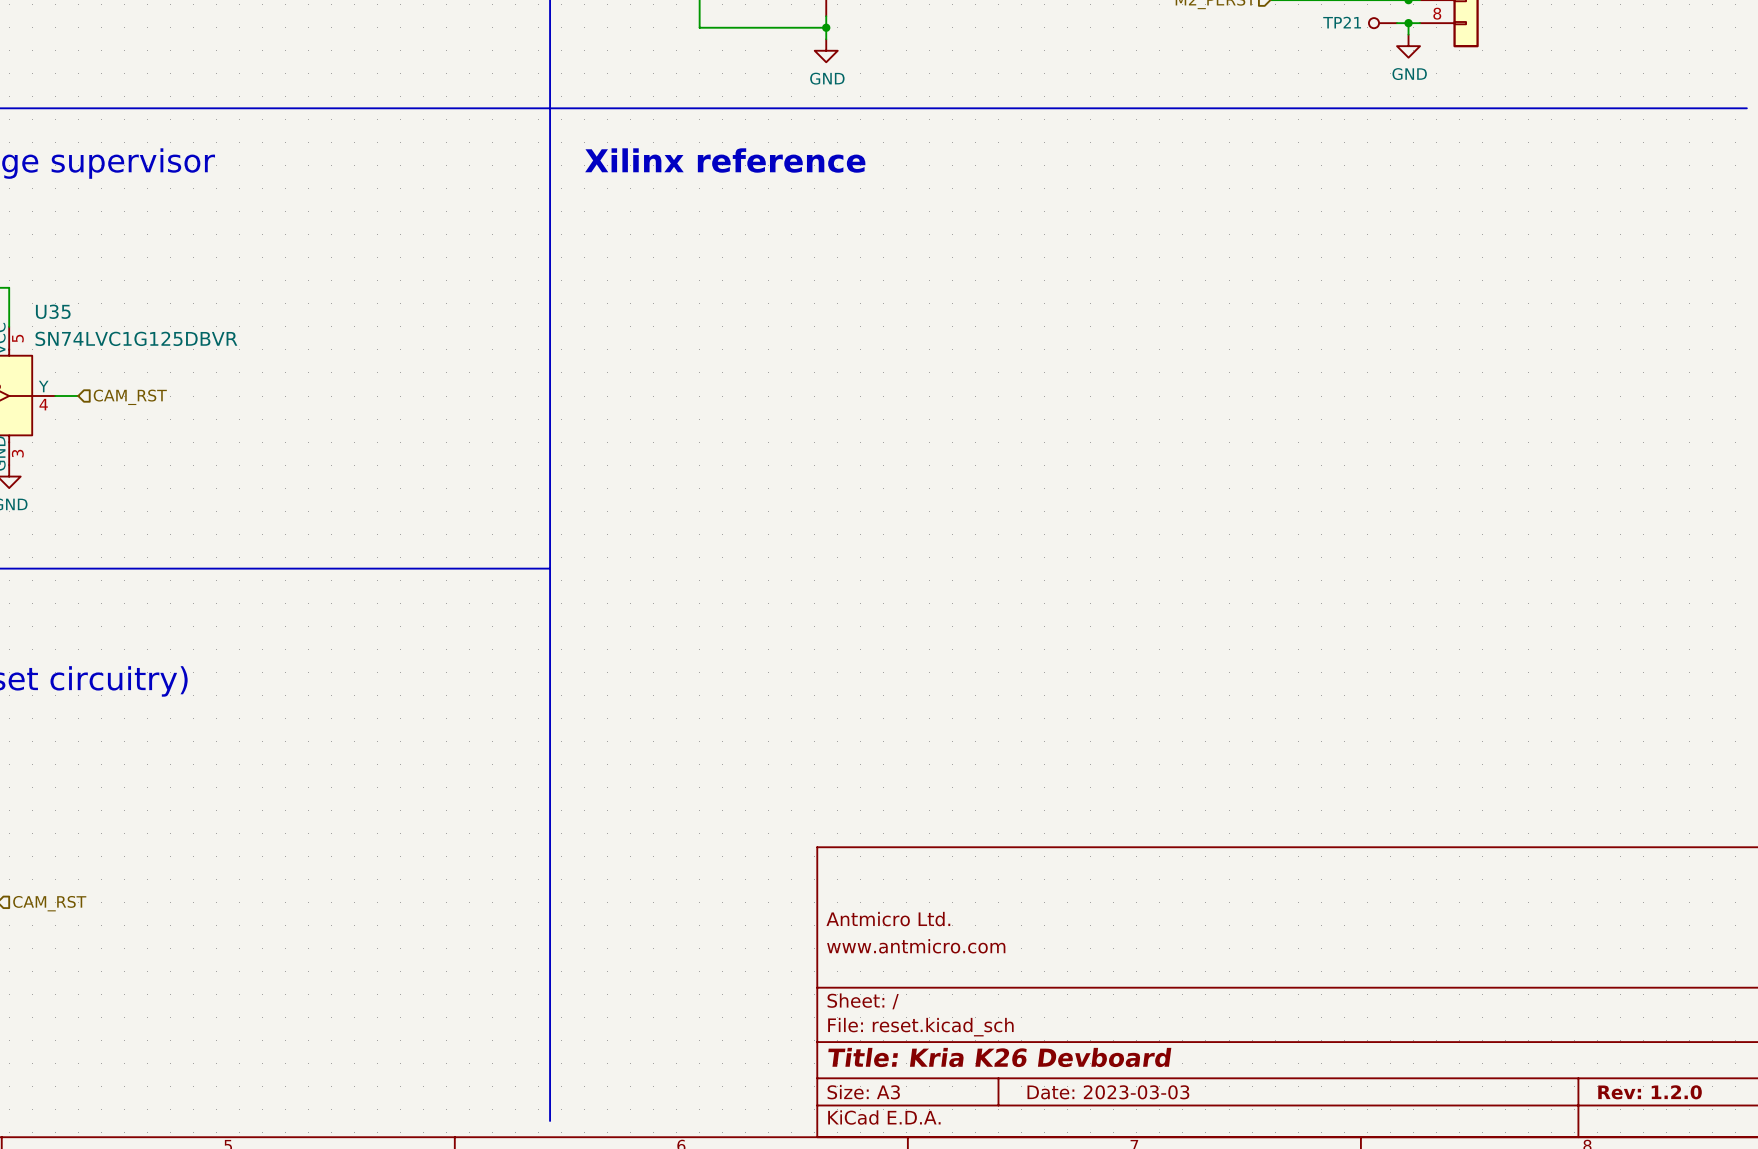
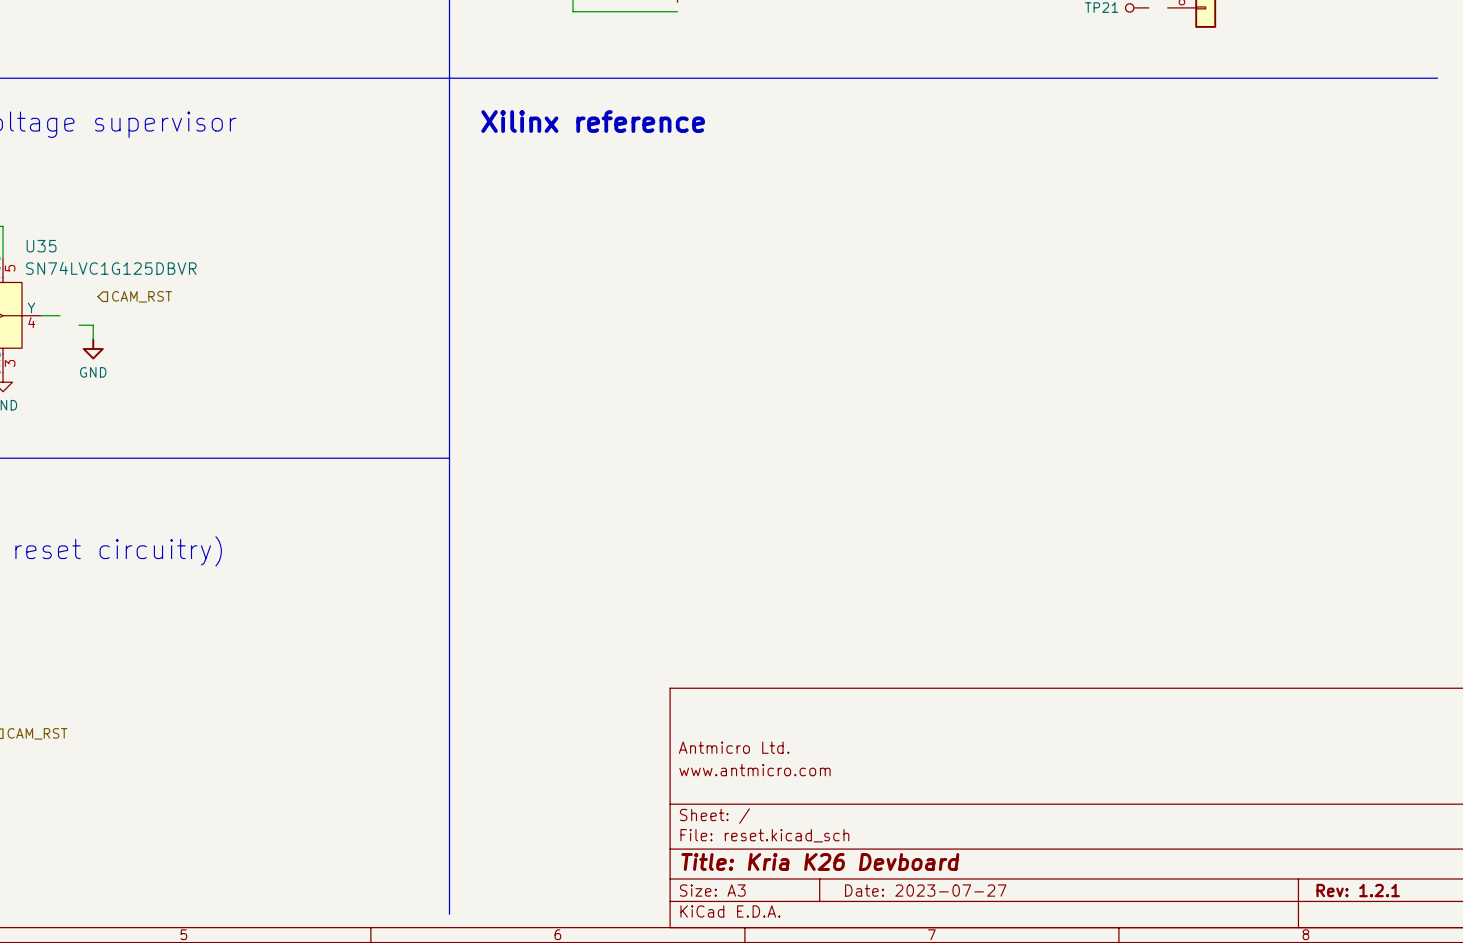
wire: (826, 16) (826, 39) -> none
wire: (1397, 23) (1420, 23) -> none
wire: (1408, 23) (1408, 34) -> none
junction: (1408, 23) -> none
junction: (826, 27) -> none
power symbol: GND (1408, 46) -> none
power symbol: GND (826, 50) -> none
hierarchical label position: CAM_RST (130, 397) -> CAM_RST (142, 296)
wire: none -> (79, 325) (93, 325) (93, 339)
power symbol: none -> GND (93, 348)
title block: Date: 2023-03-03 (1108, 1092) -> Date: 2023-07-27 (925, 890)
title block: Rev: 1.2.0 (1650, 1092) -> Rev: 1.2.1 (1358, 890)

